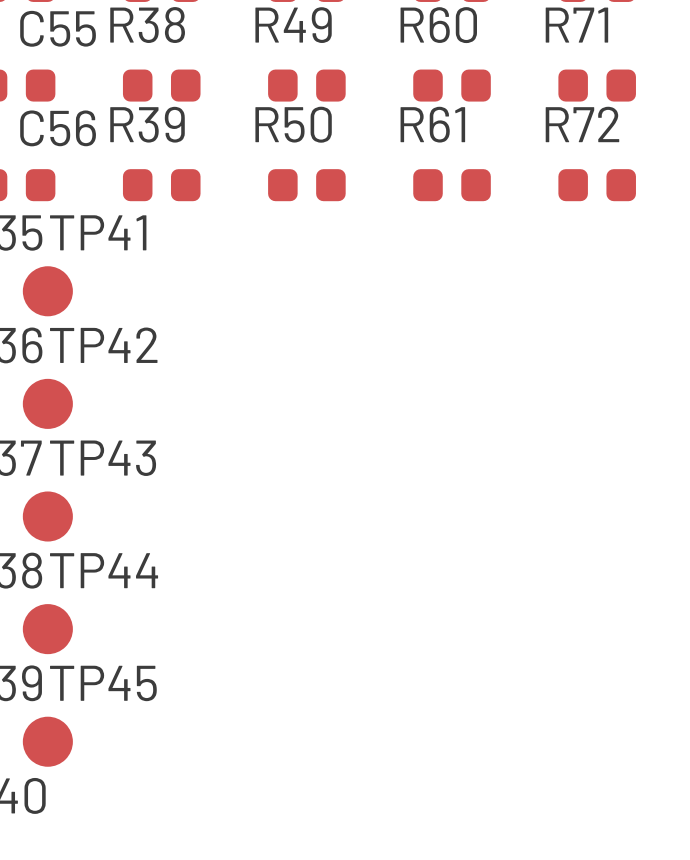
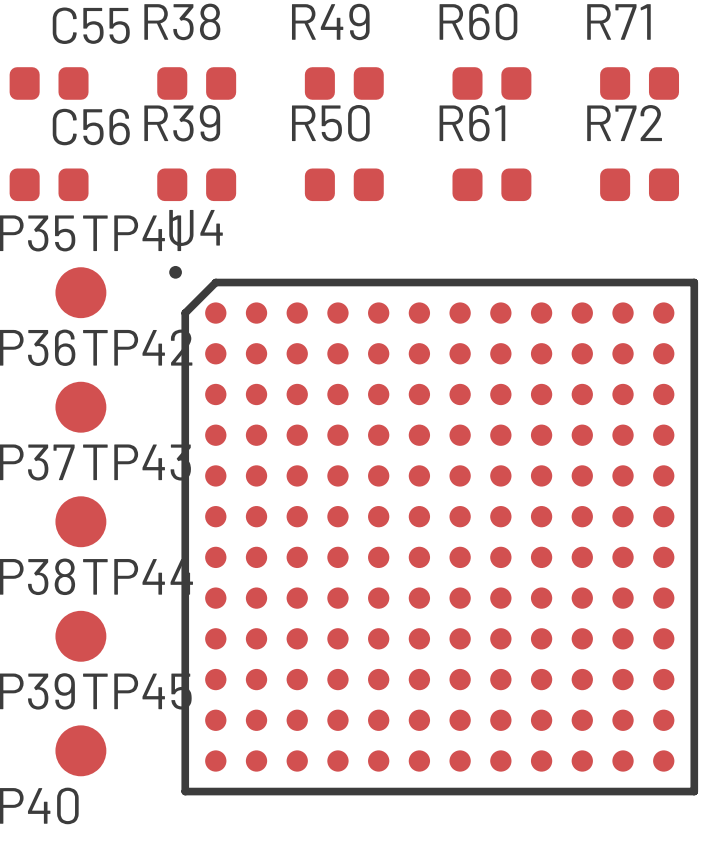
U4: none -> (433, 530)

